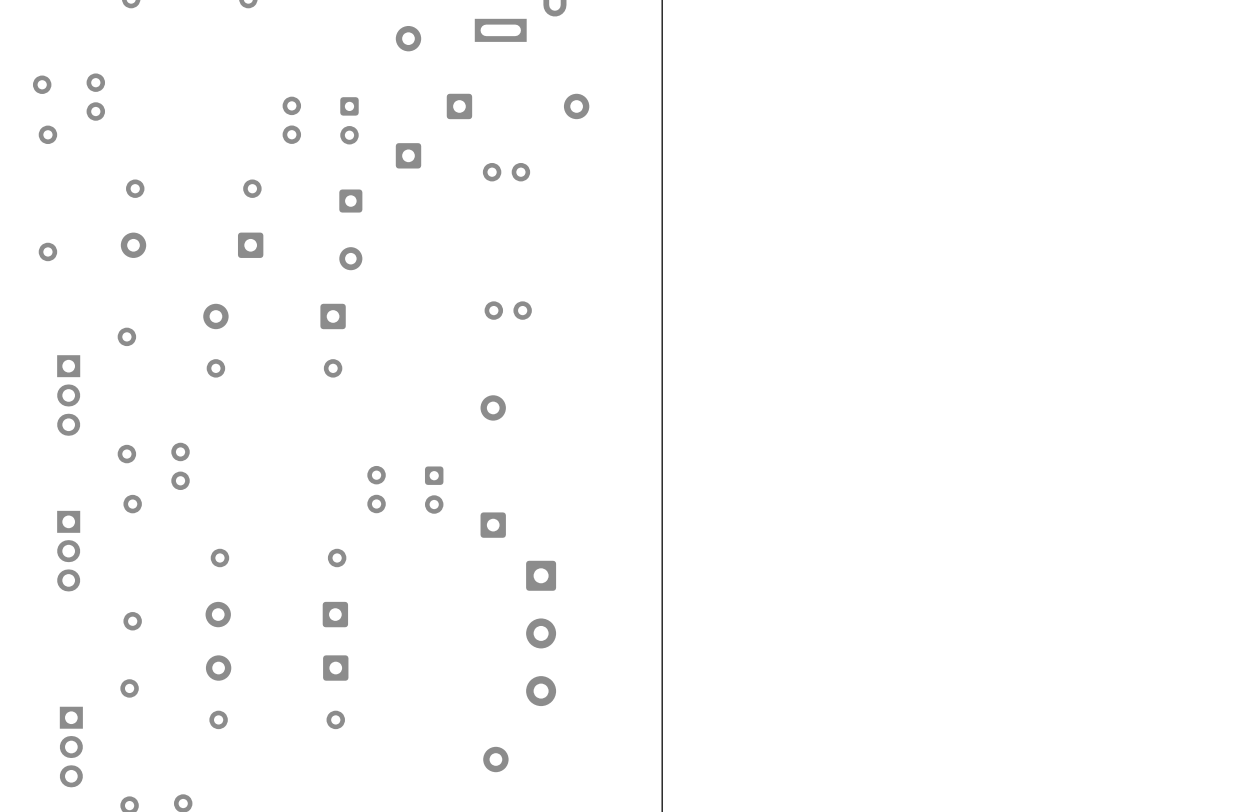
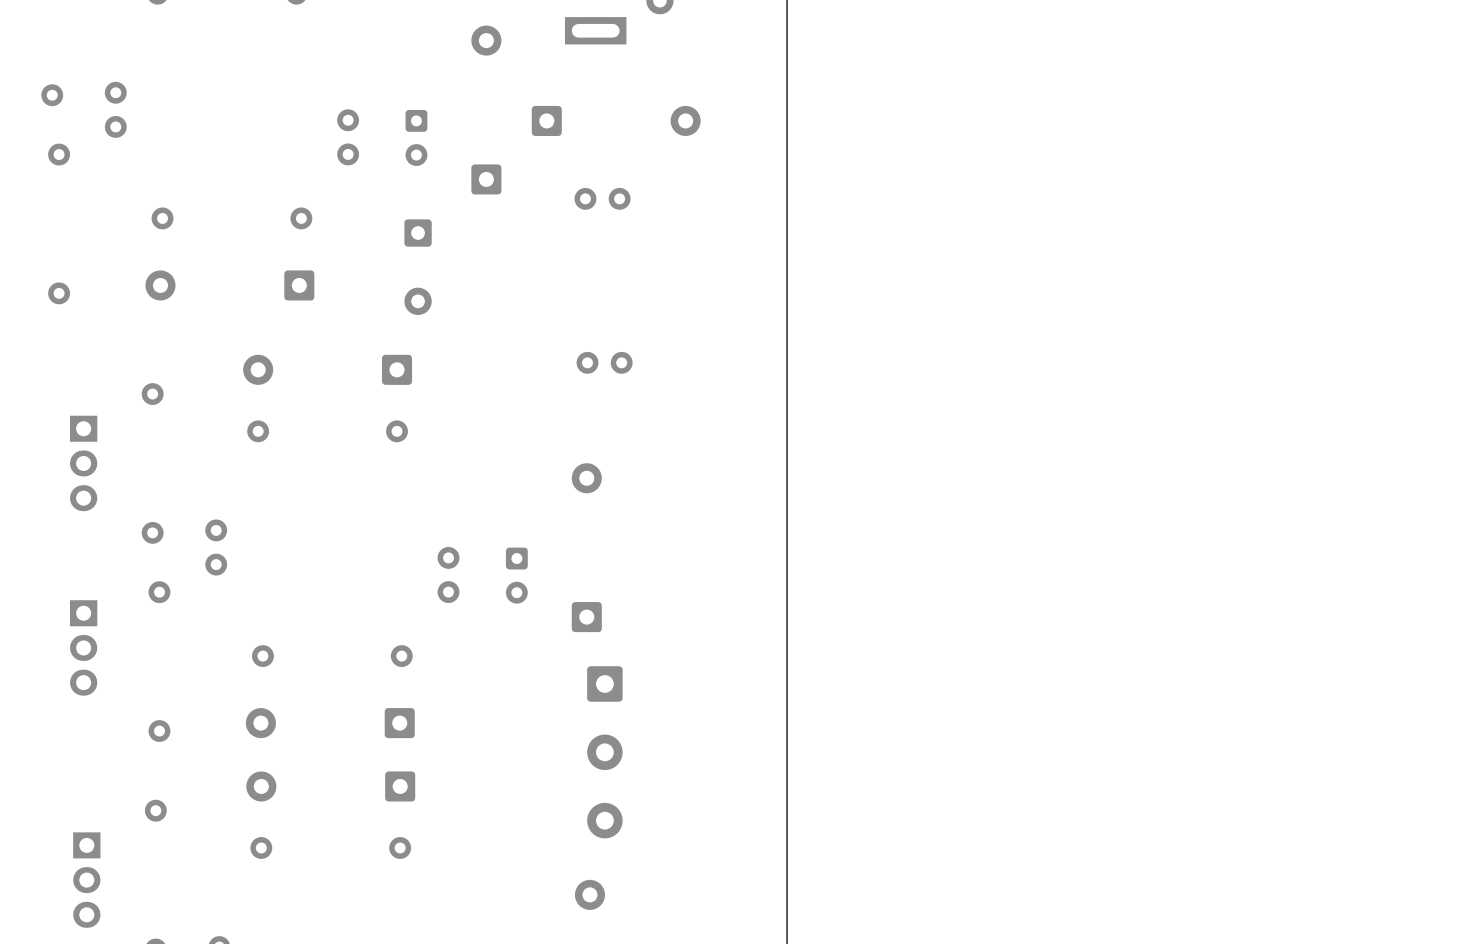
part position: (541, 633) -> (604, 752)

